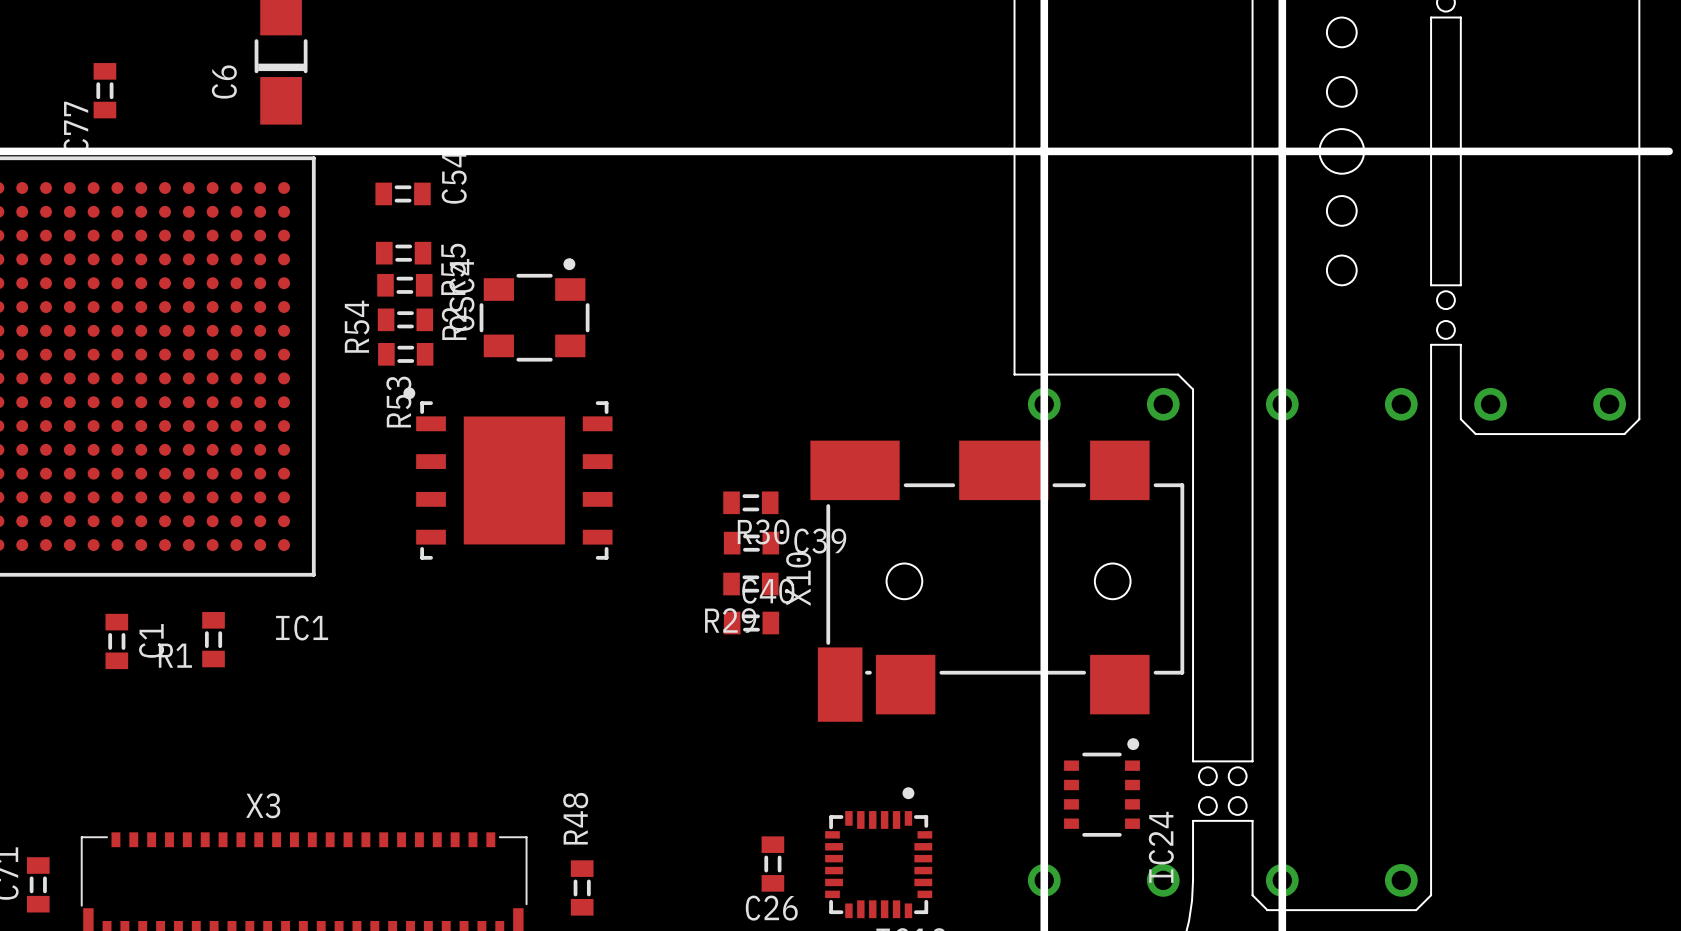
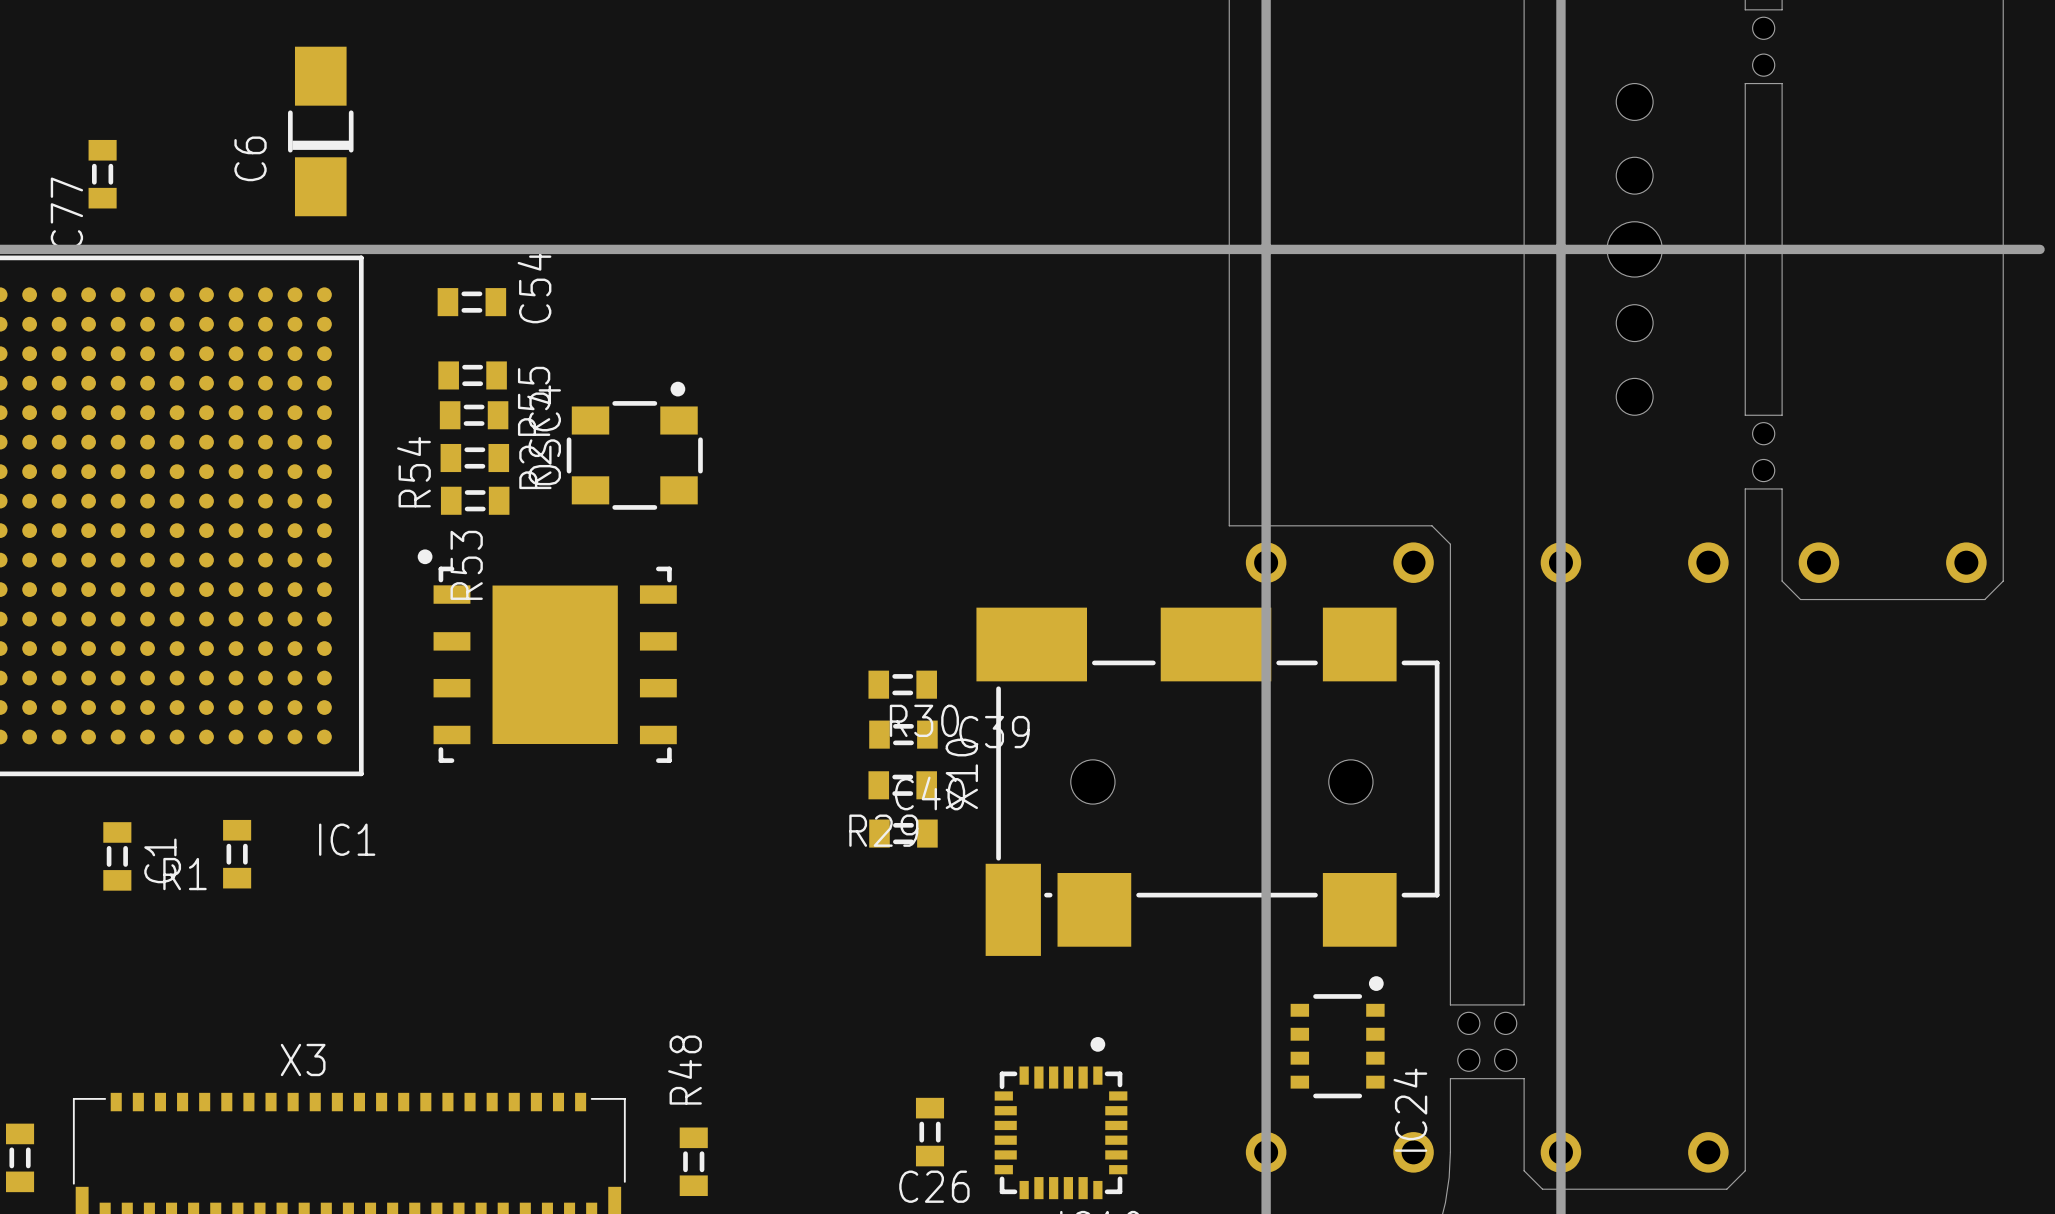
part position: (507, 473) -> (547, 656)

